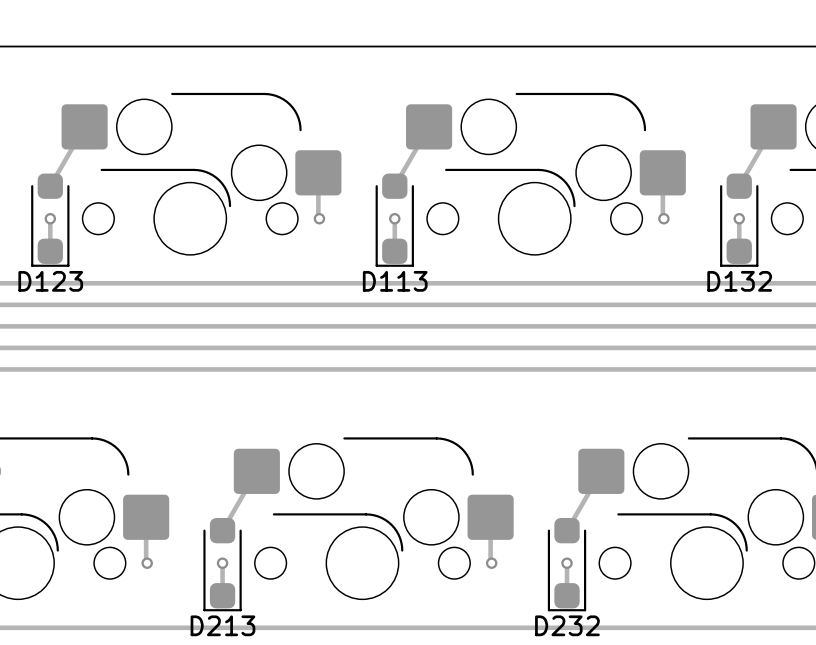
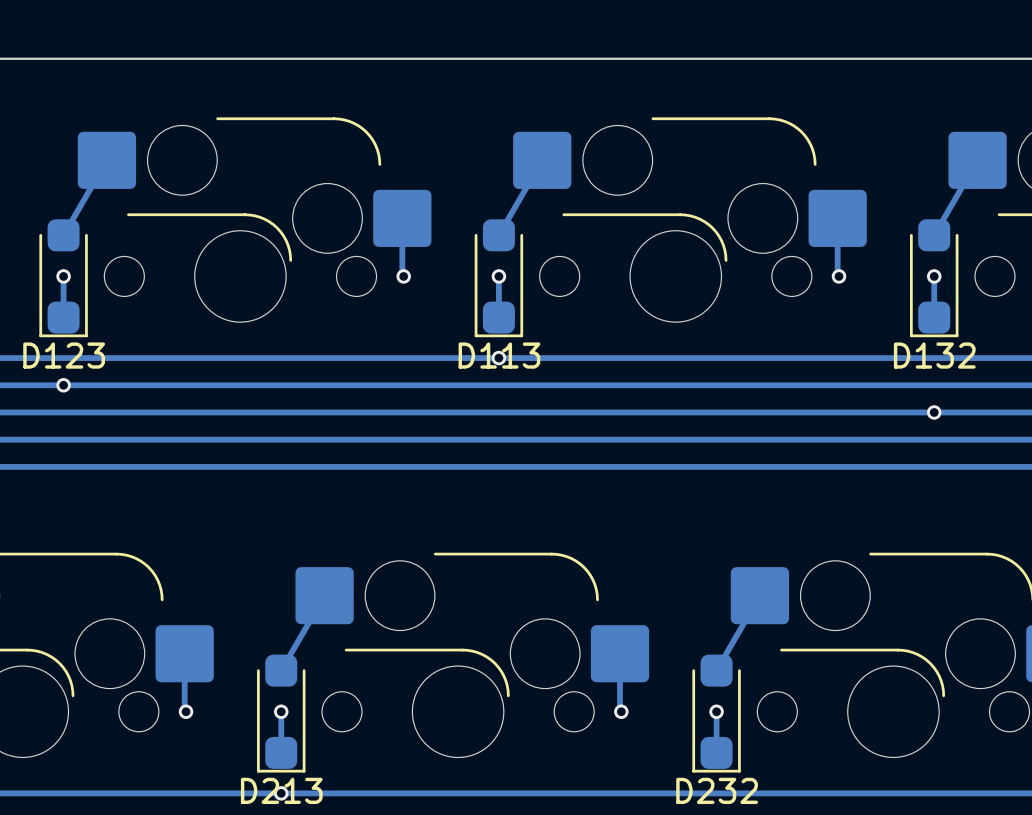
via: none -> (498, 358)
via: none -> (63, 385)
via: none -> (934, 412)
via: none -> (281, 793)

